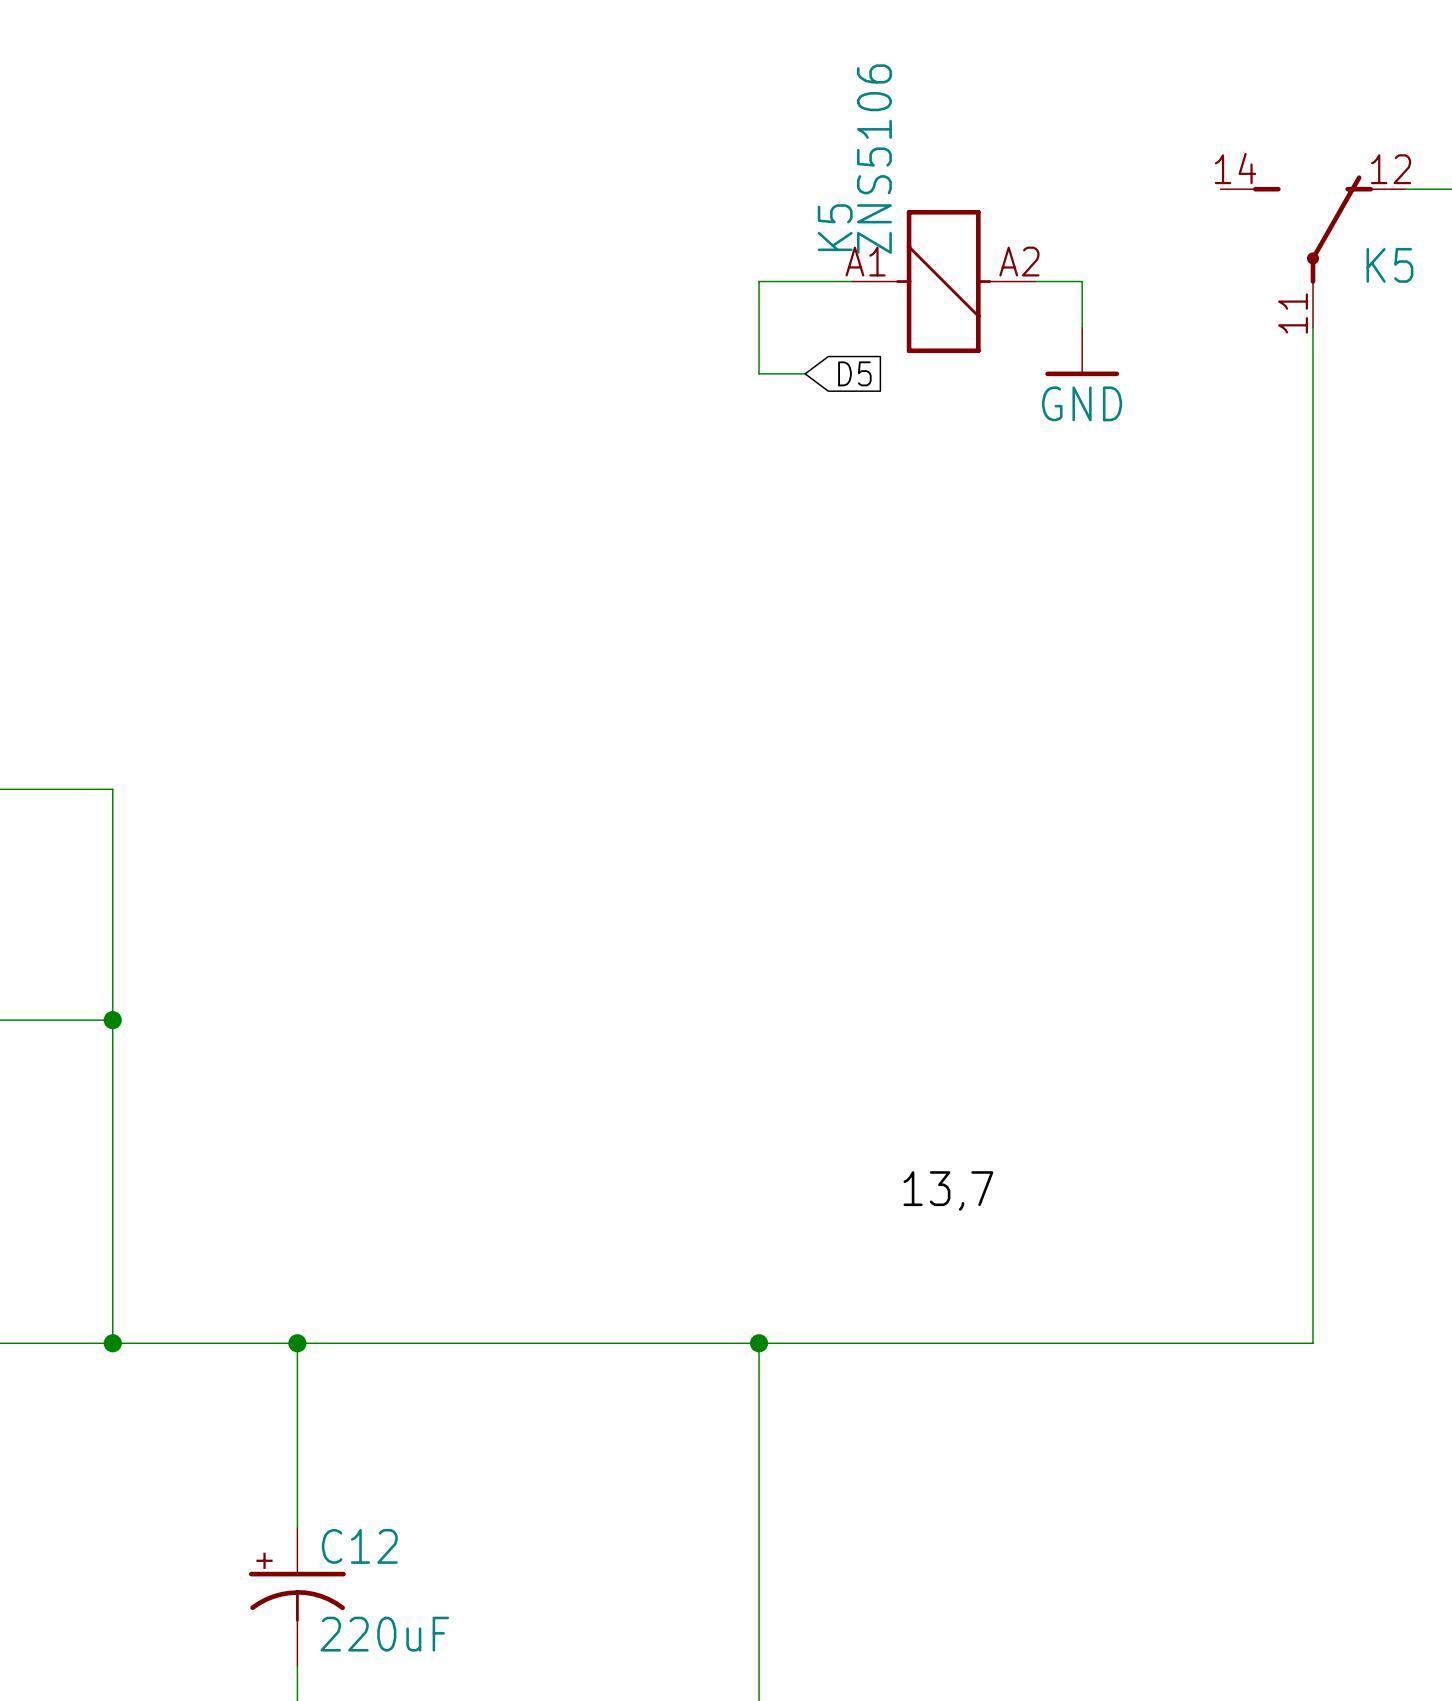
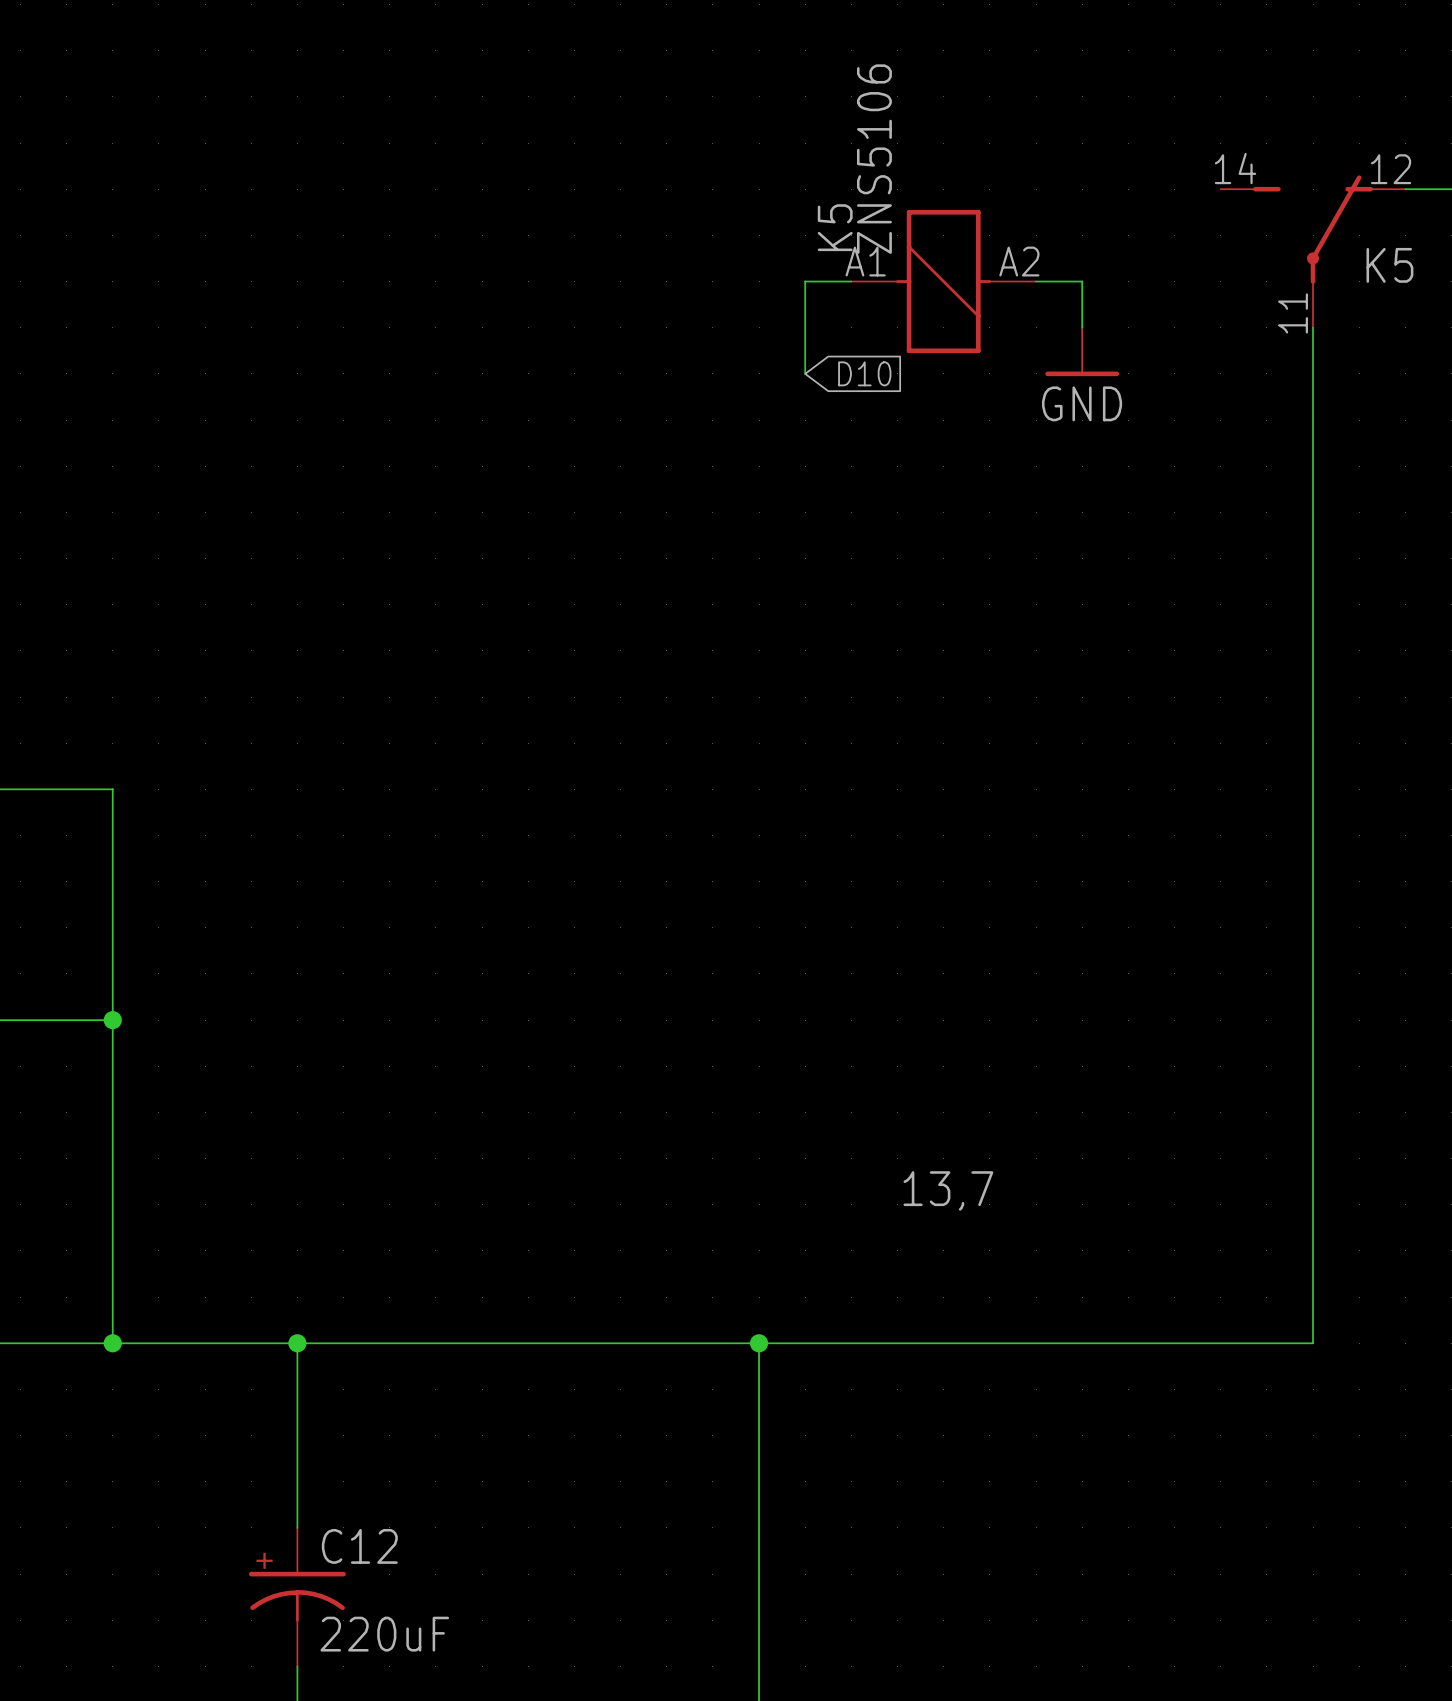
wire: (805, 281) (759, 281) (759, 373) (805, 373) -> (805, 281) (805, 373)
global label: D5 (854, 373) -> D10 (864, 373)

